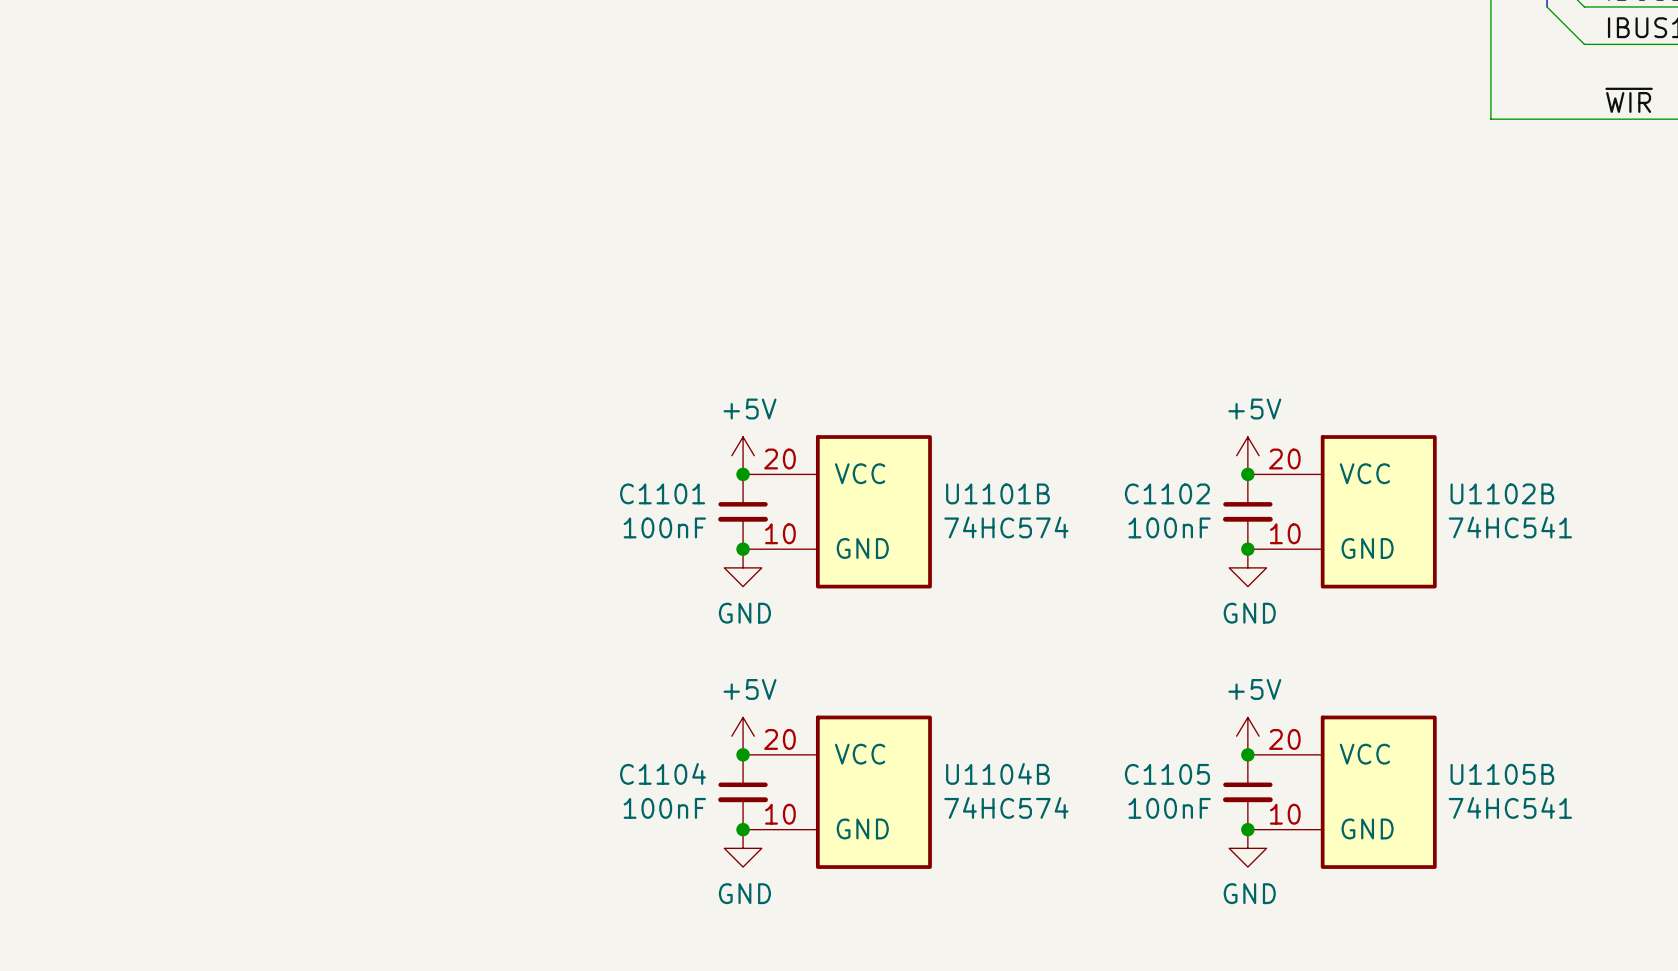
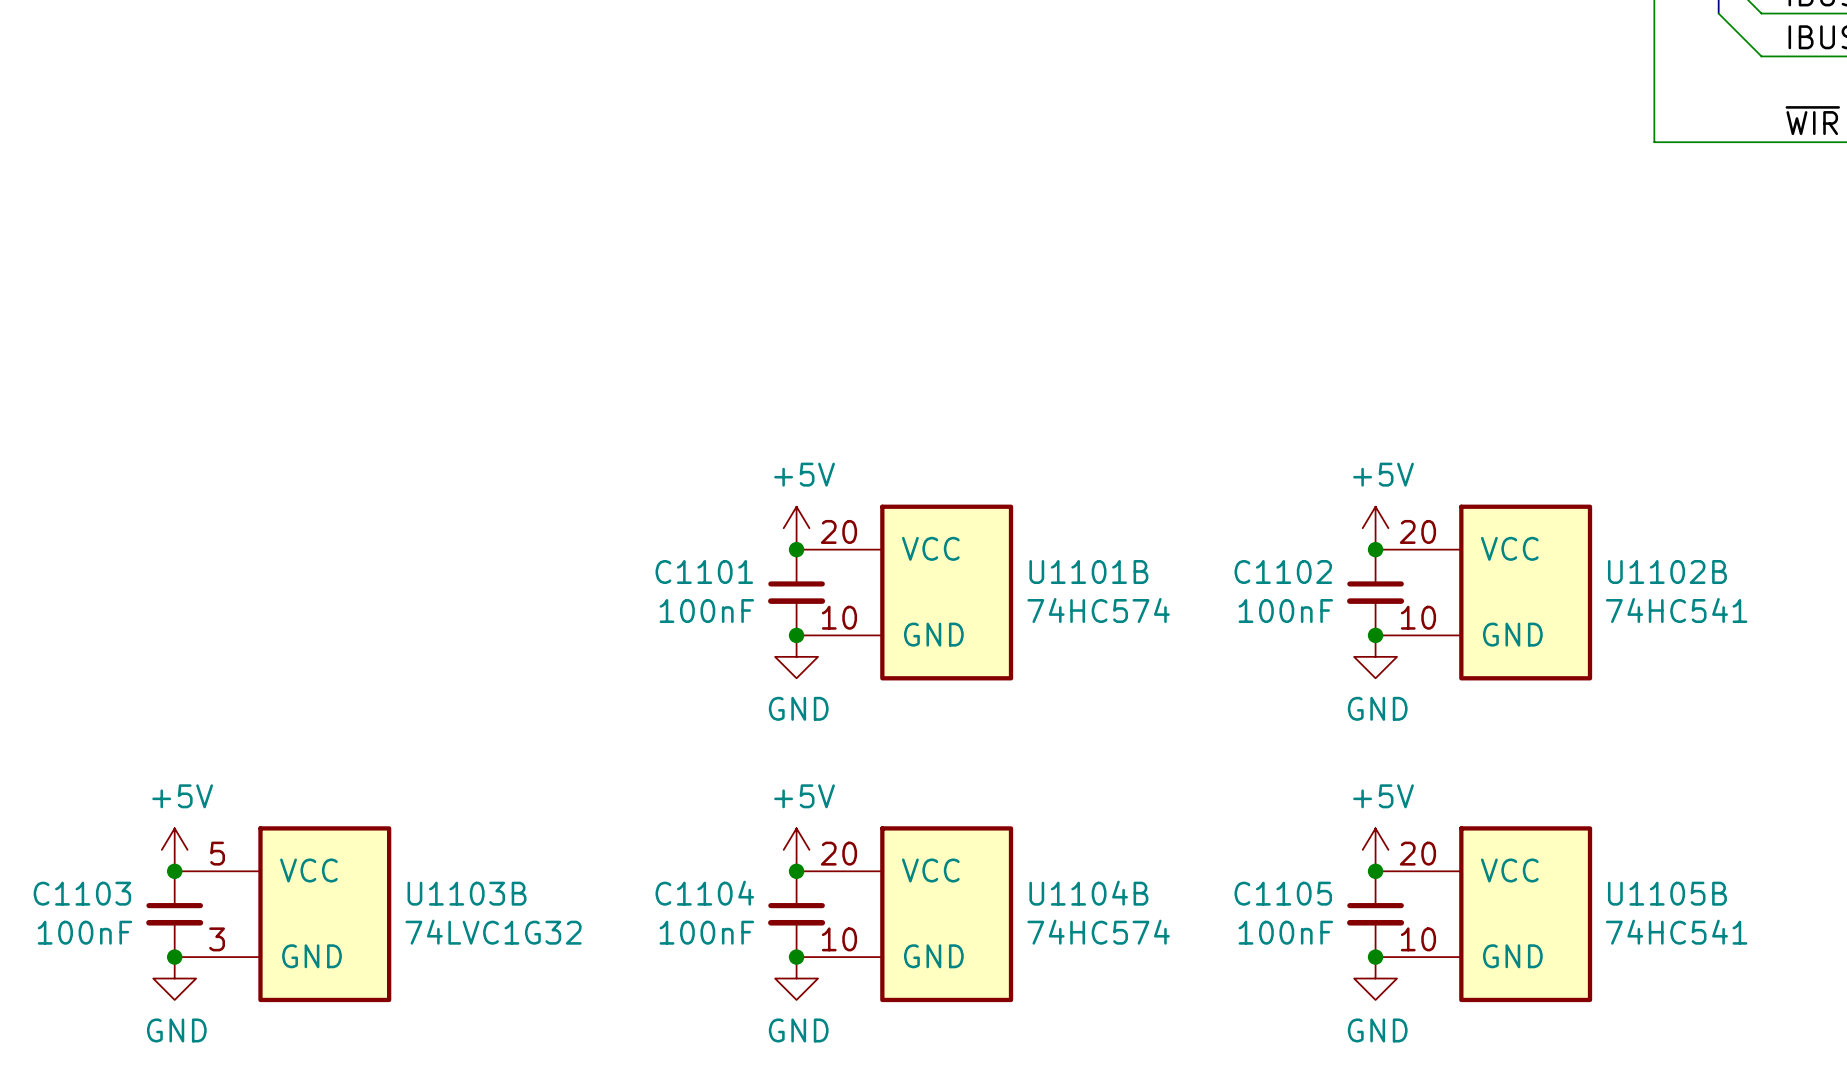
power symbol: none -> +5V (174, 849)
junction: none -> (174, 871)
C1103: none -> 100nF (174, 914)
U1103B: none -> 74LVC1G32 (282, 914)
junction: none -> (174, 957)
power symbol: none -> GND (174, 978)

